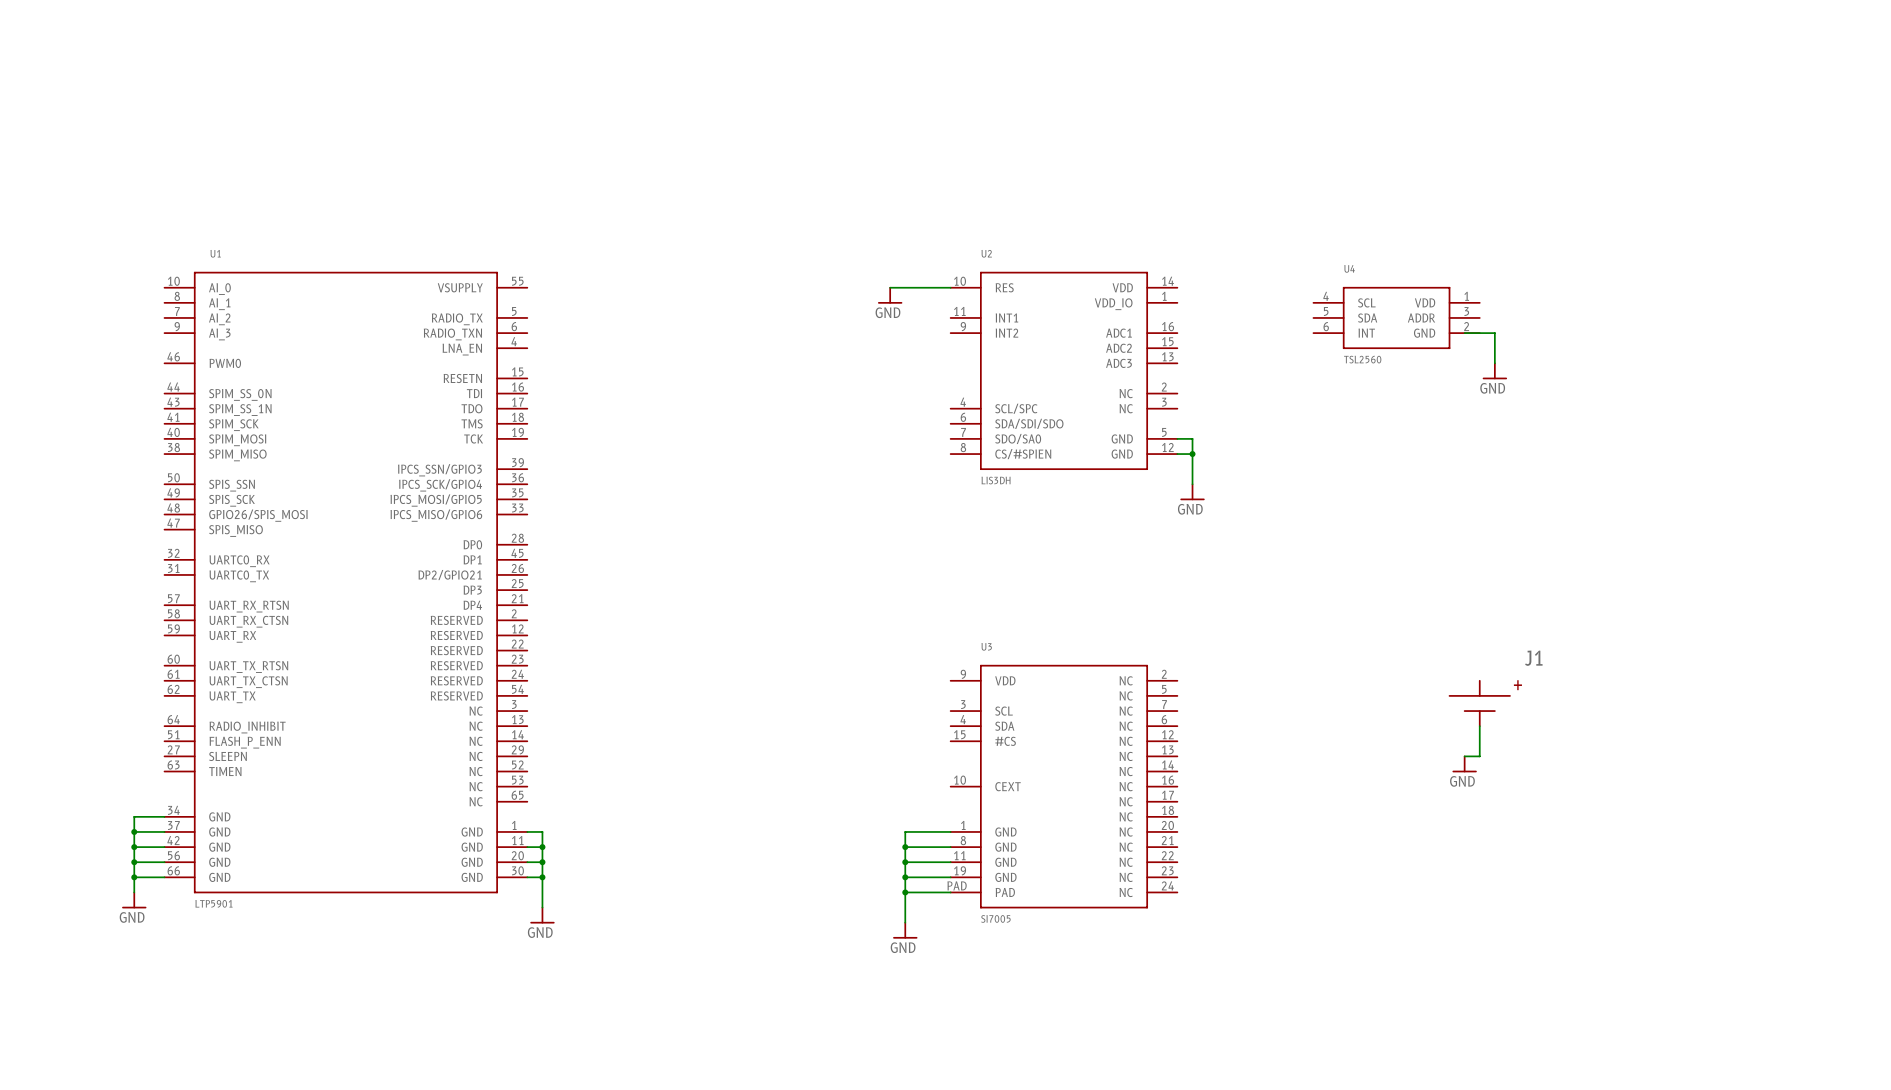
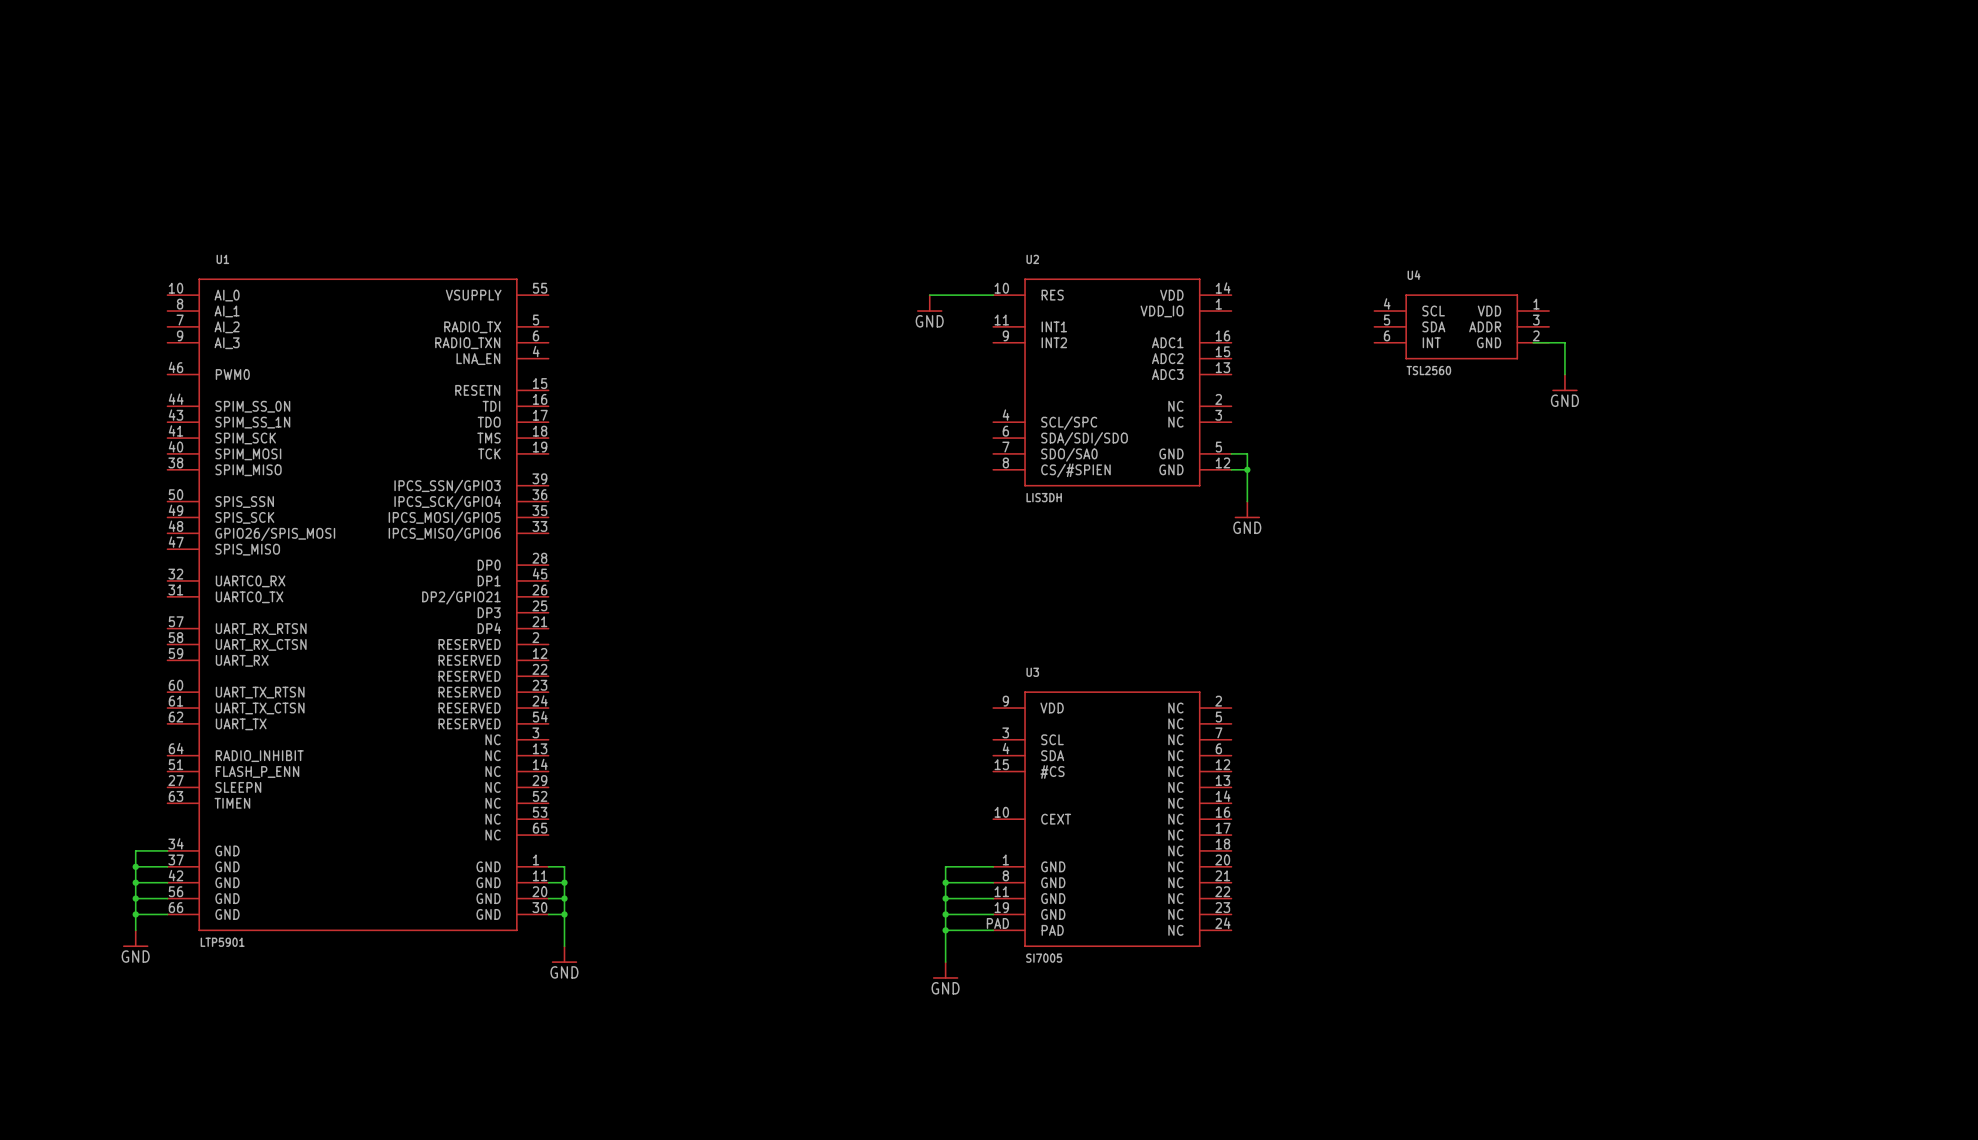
J1: (1479, 703) -> none
wire: (1479, 726) (1479, 756) (1464, 756) -> none
power symbol: GND (1464, 764) -> none

